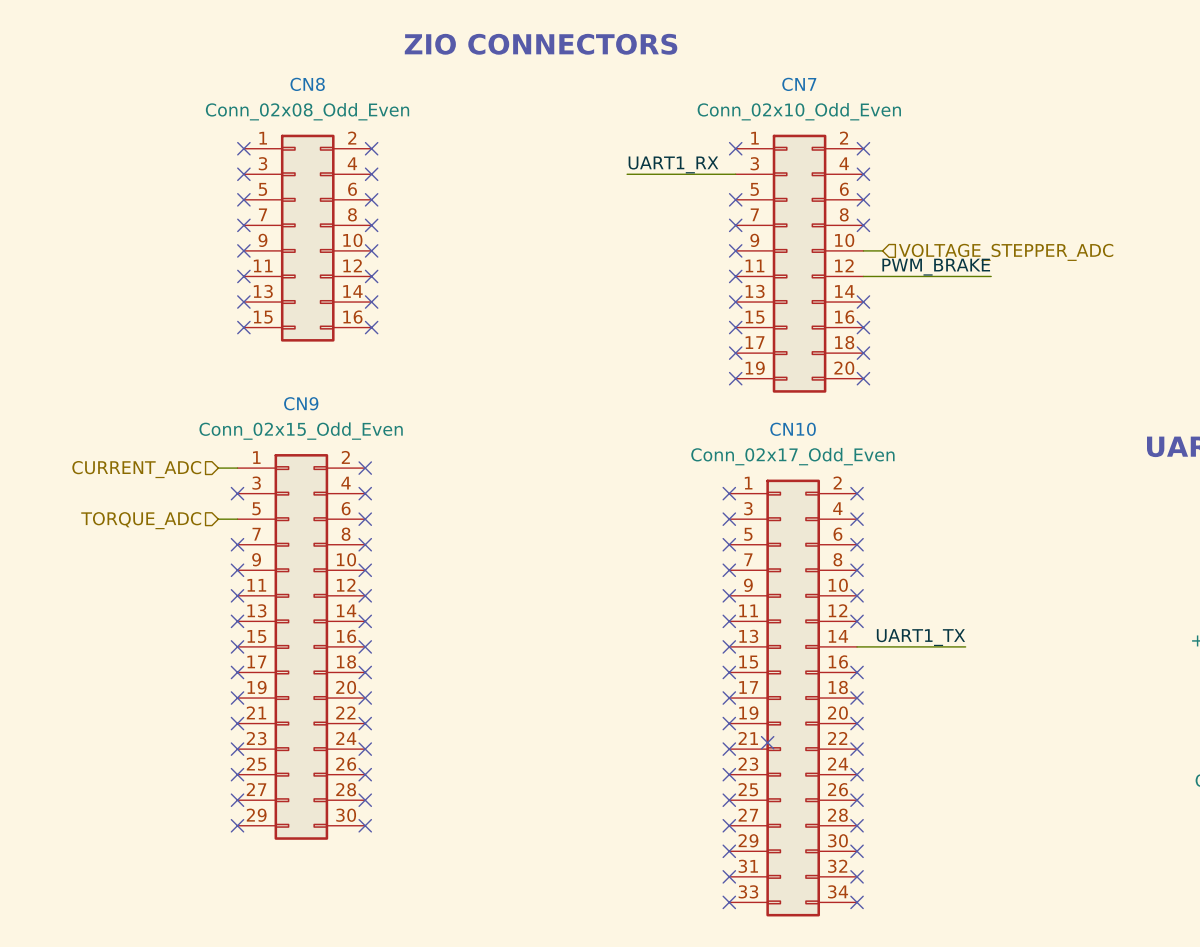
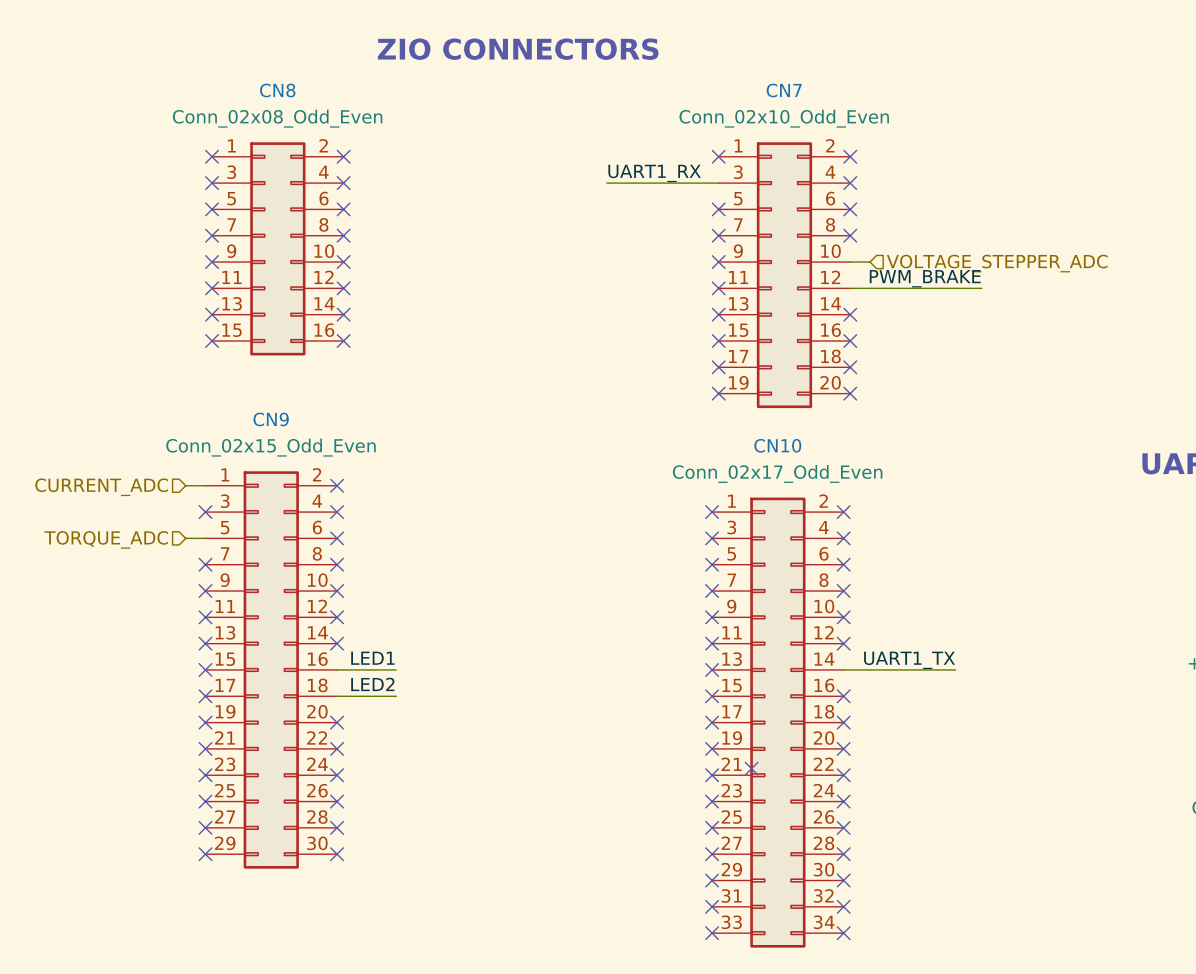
label: none -> LED1 (372, 658)
wire: none -> (337, 669) (396, 669)
no-connect mark: (365, 646) -> none
label: none -> LED2 (372, 684)
wire: none -> (337, 696) (396, 696)
no-connect mark: (365, 672) -> none

